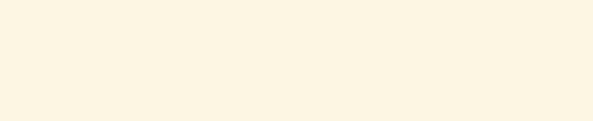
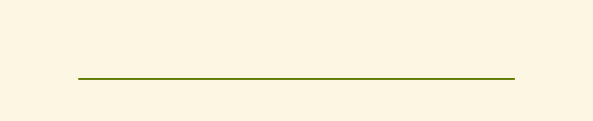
wire: none -> (78, 78) (514, 78)

